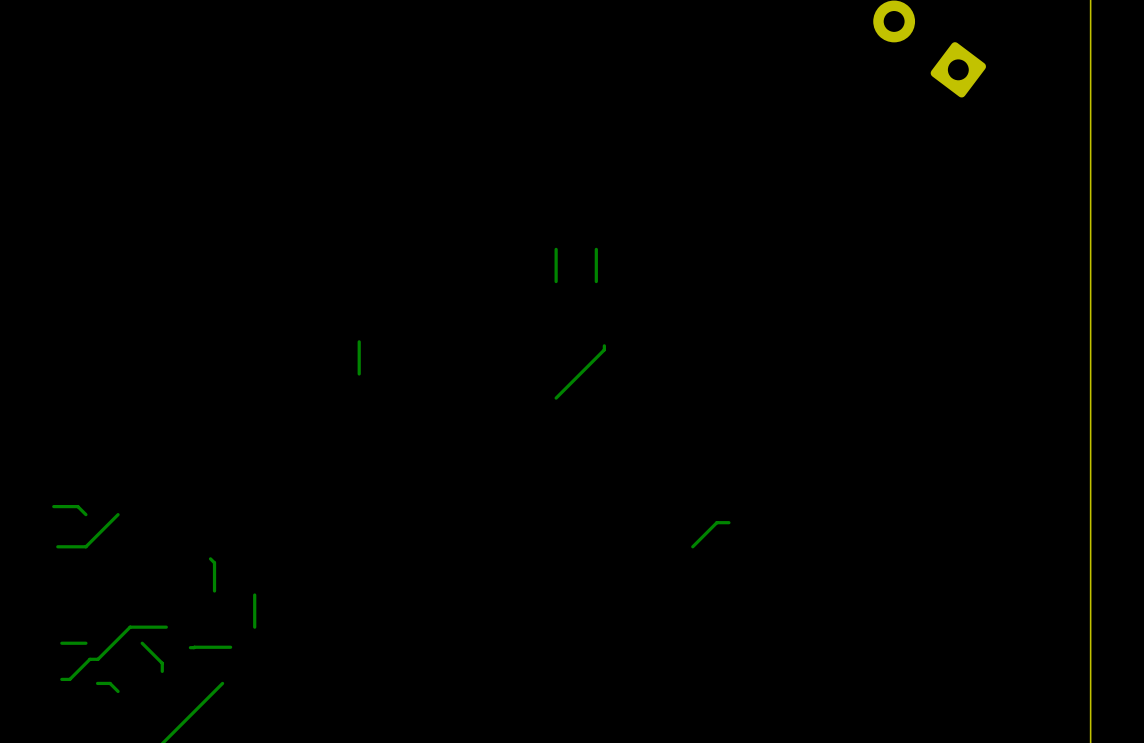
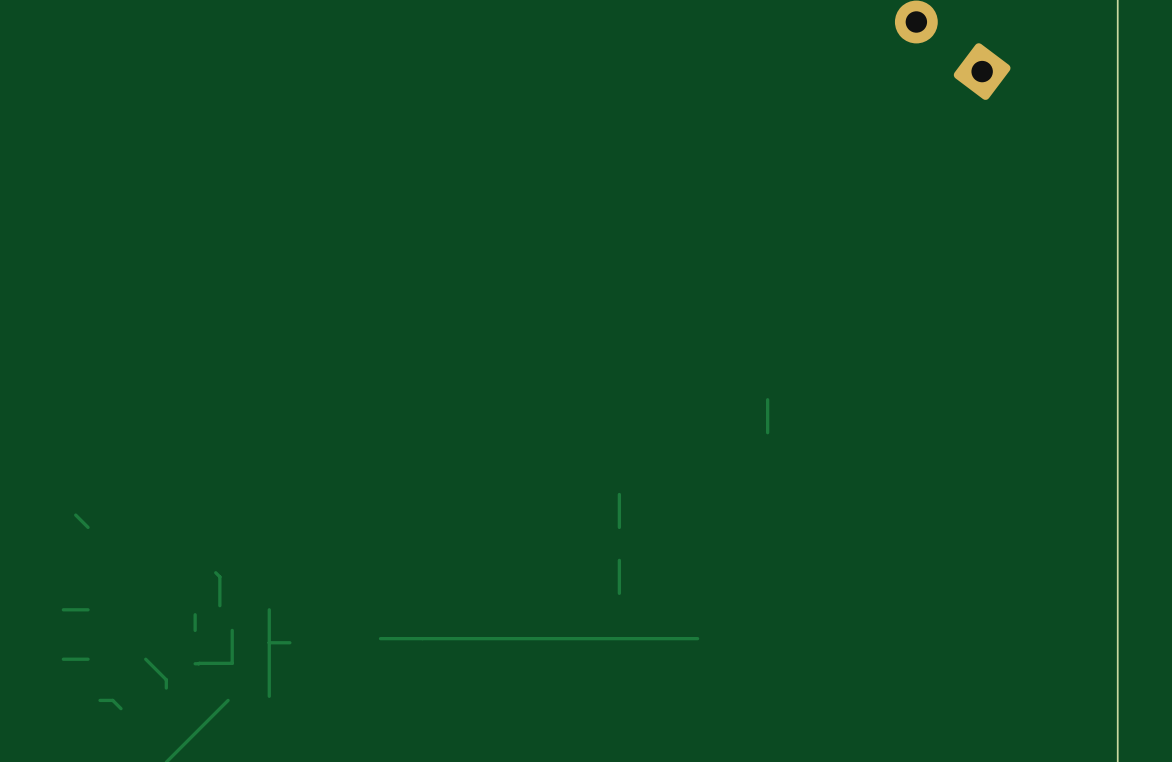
track: (556, 249) (556, 281) -> (619, 494) (619, 527)
track: (596, 249) (596, 281) -> (767, 399) (767, 432)
track: (359, 341) (359, 373) -> (619, 560) (619, 593)
track: (604, 345) (604, 349) (556, 398) -> none
track: (77, 506) (53, 506) -> (79, 519) (75, 515)
track: (118, 514) (85, 546) (57, 546) -> none
track: (728, 522) (716, 522) (692, 546) -> none
track: none -> (88, 609) (63, 609)
track: (254, 595) (254, 627) -> none
track: none -> (269, 609) (269, 696)
track: none -> (195, 614) (195, 630)
track: none -> (697, 638) (380, 638)
track: (166, 627) (130, 627) (97, 659) (89, 659) (69, 679) (61, 679) -> none
track: none -> (289, 642) (269, 642)
track: (230, 647) (226, 647) -> (232, 630) (232, 663)

